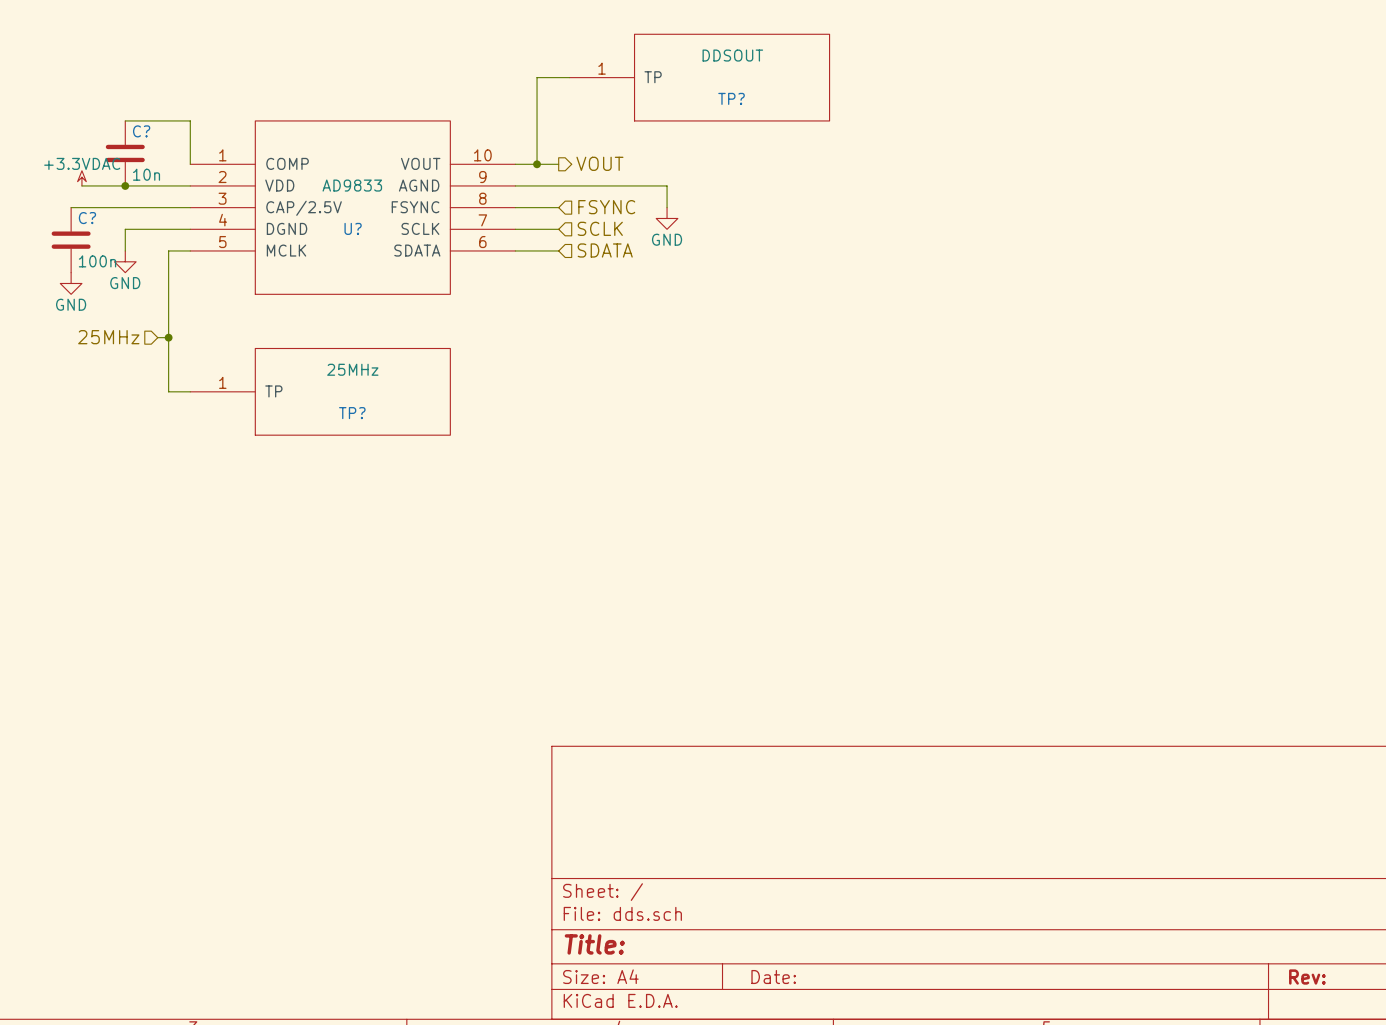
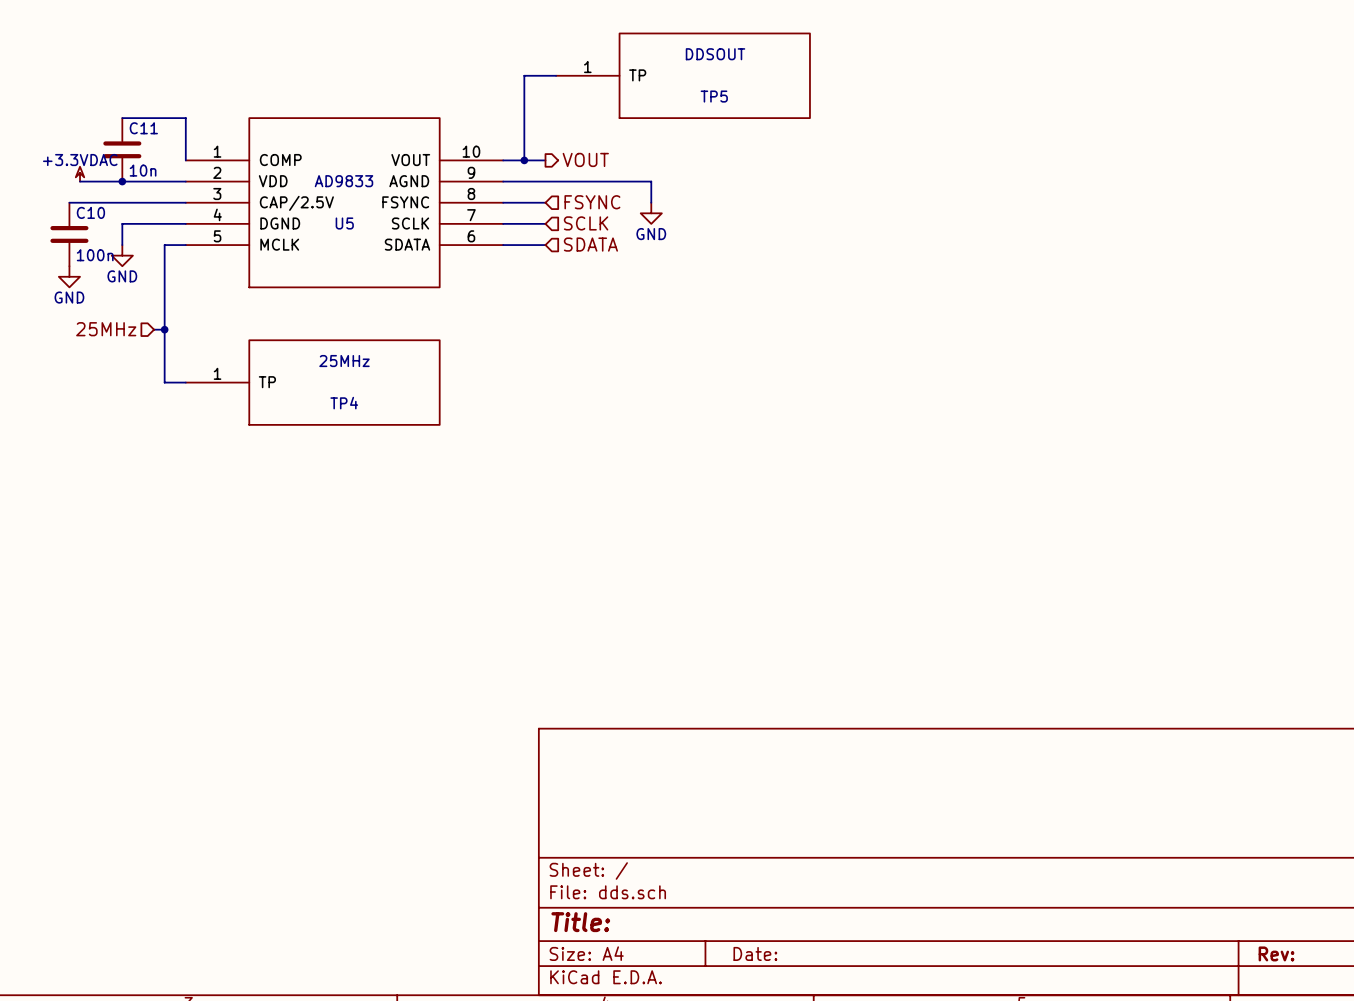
TP? name: TP? (731, 98) -> TP5 (714, 96)
C? name: C? (141, 131) -> C11 (143, 128)
C? name: C? (87, 218) -> C10 (90, 212)
U? name: U? (353, 228) -> U5 (344, 223)
TP? name: TP? (352, 413) -> TP4 (344, 403)

